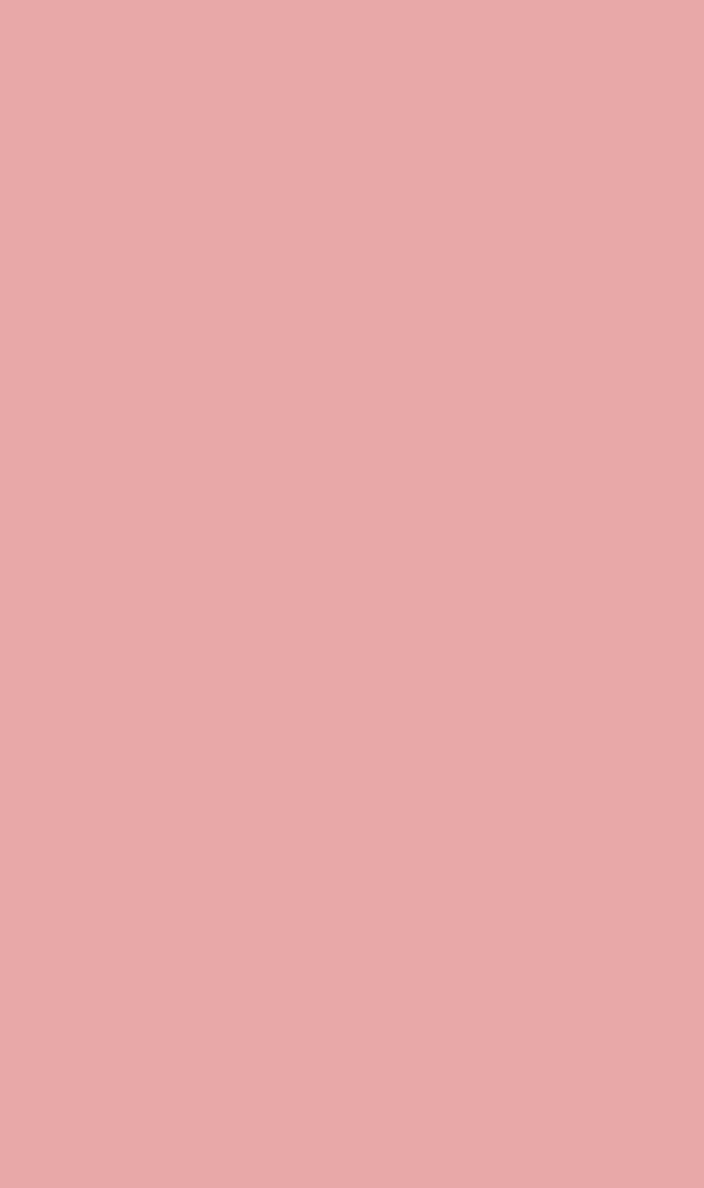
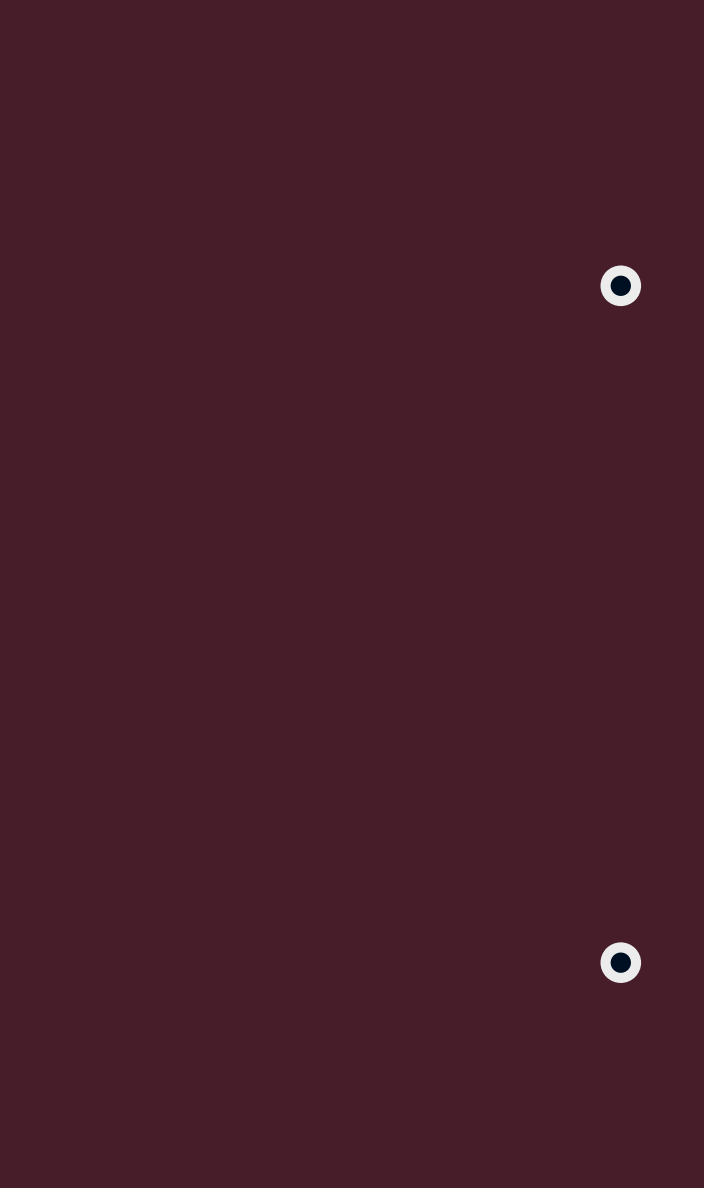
via: none -> (620, 285)
via: none -> (620, 962)

